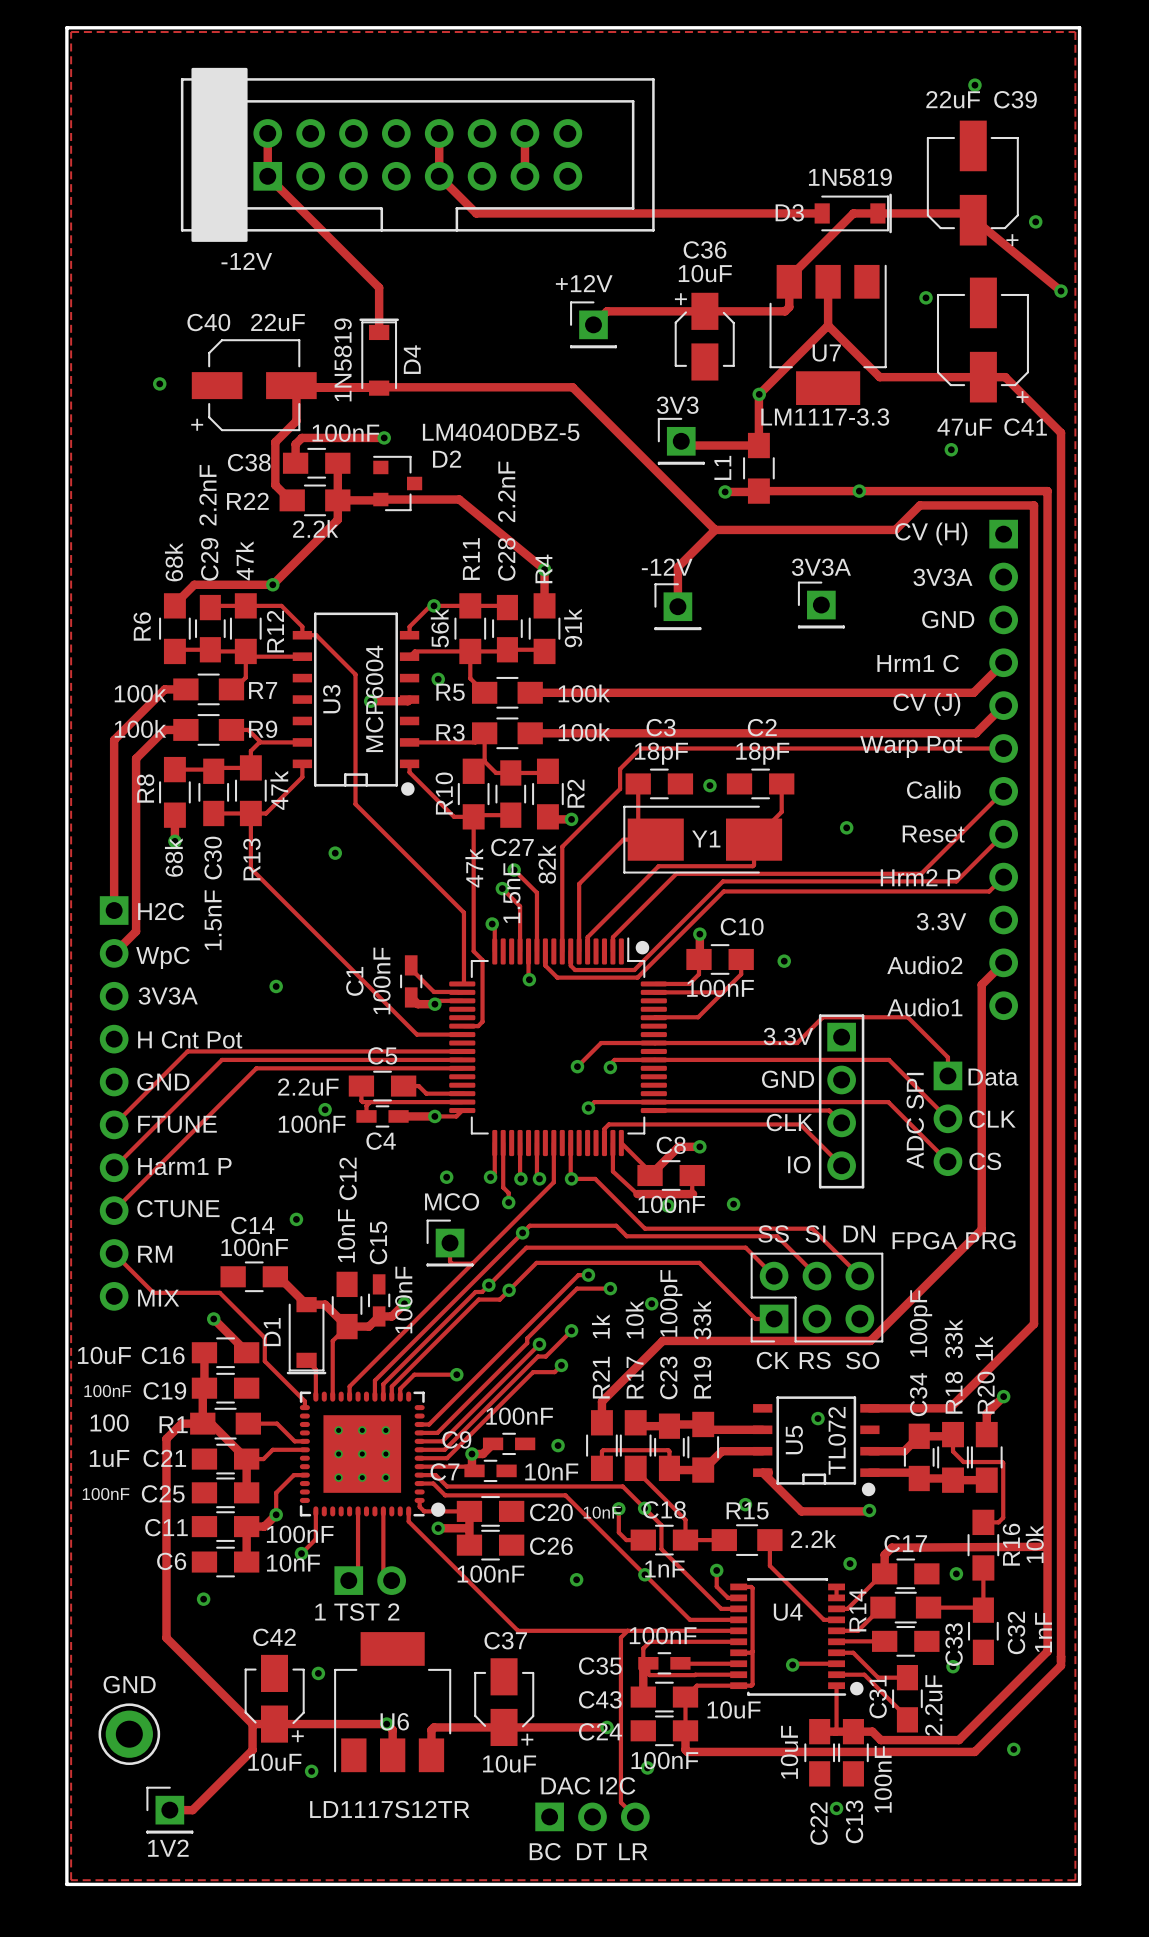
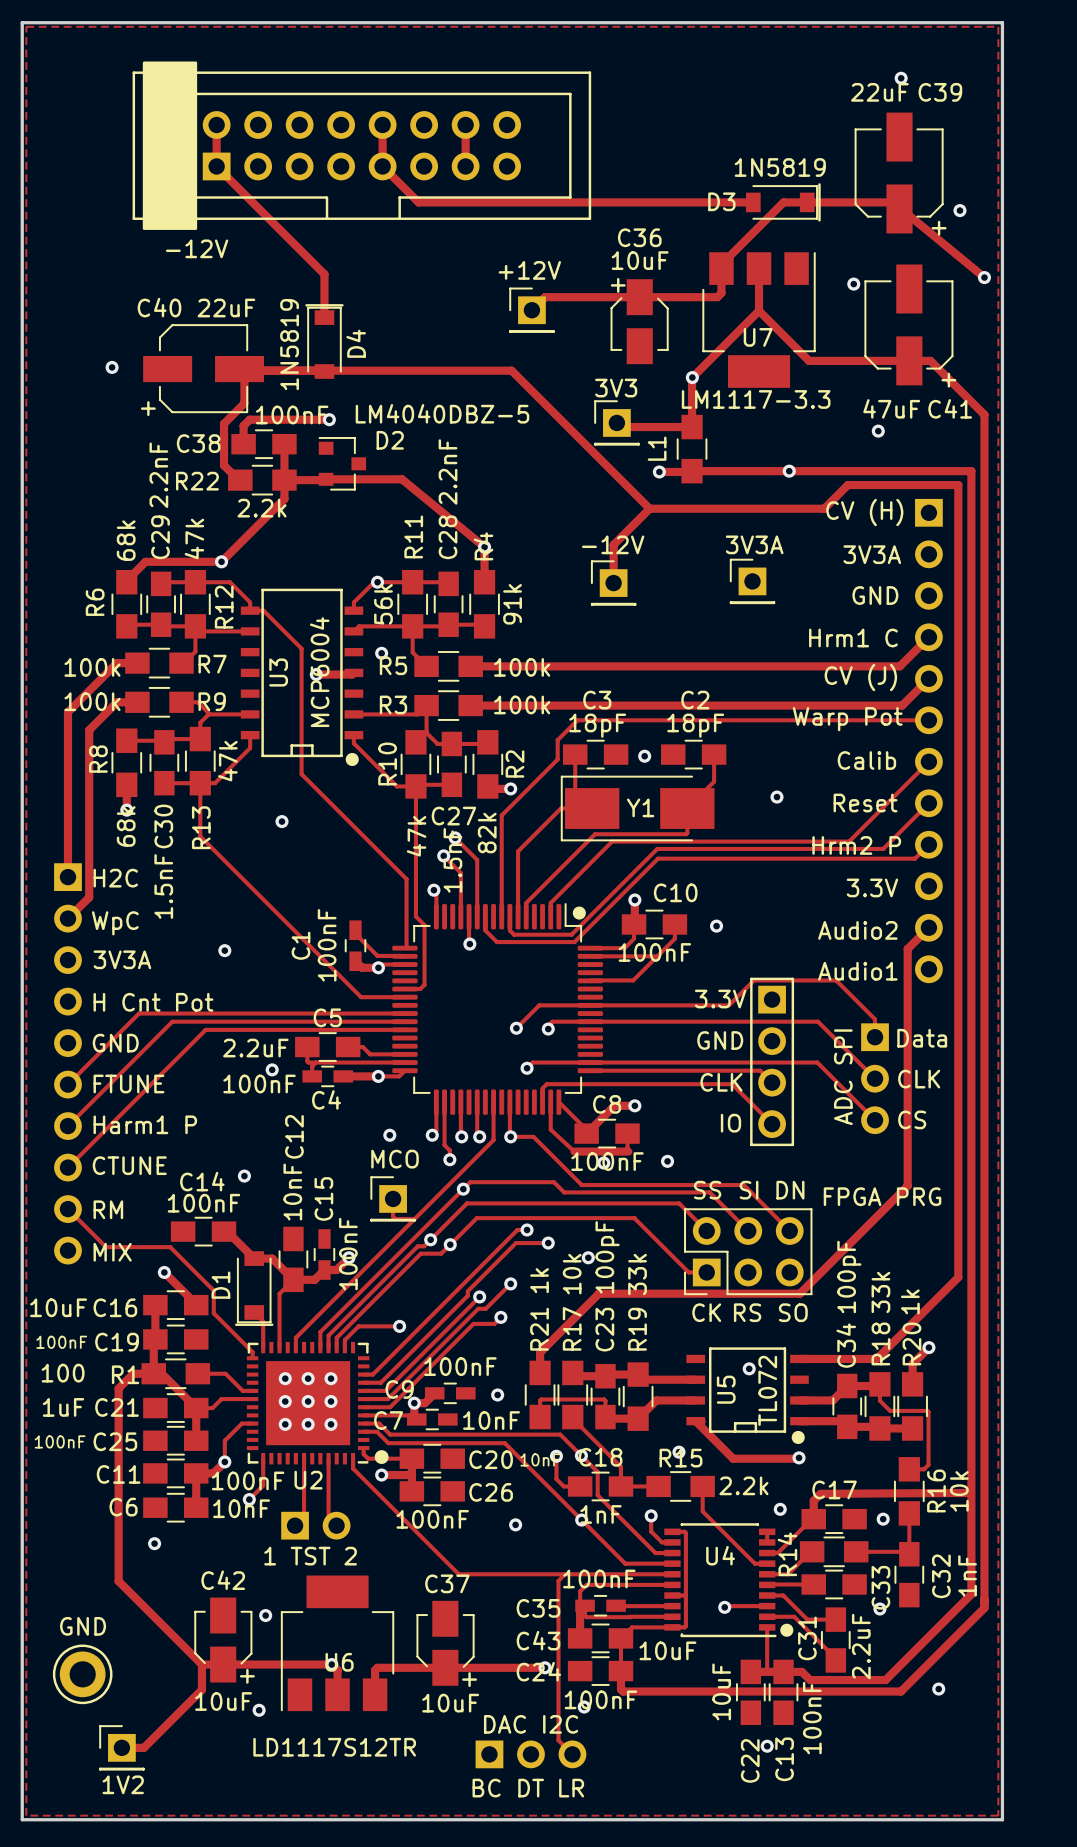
via: none -> (285, 1378)
via: none -> (308, 1378)
via: none -> (331, 1378)
via: none -> (285, 1401)
via: none -> (308, 1401)
via: none -> (331, 1401)
part: (362, 1454) -> none
U2: none -> (308, 1403)
via: none -> (285, 1424)
via: none -> (308, 1424)
via: none -> (331, 1424)

